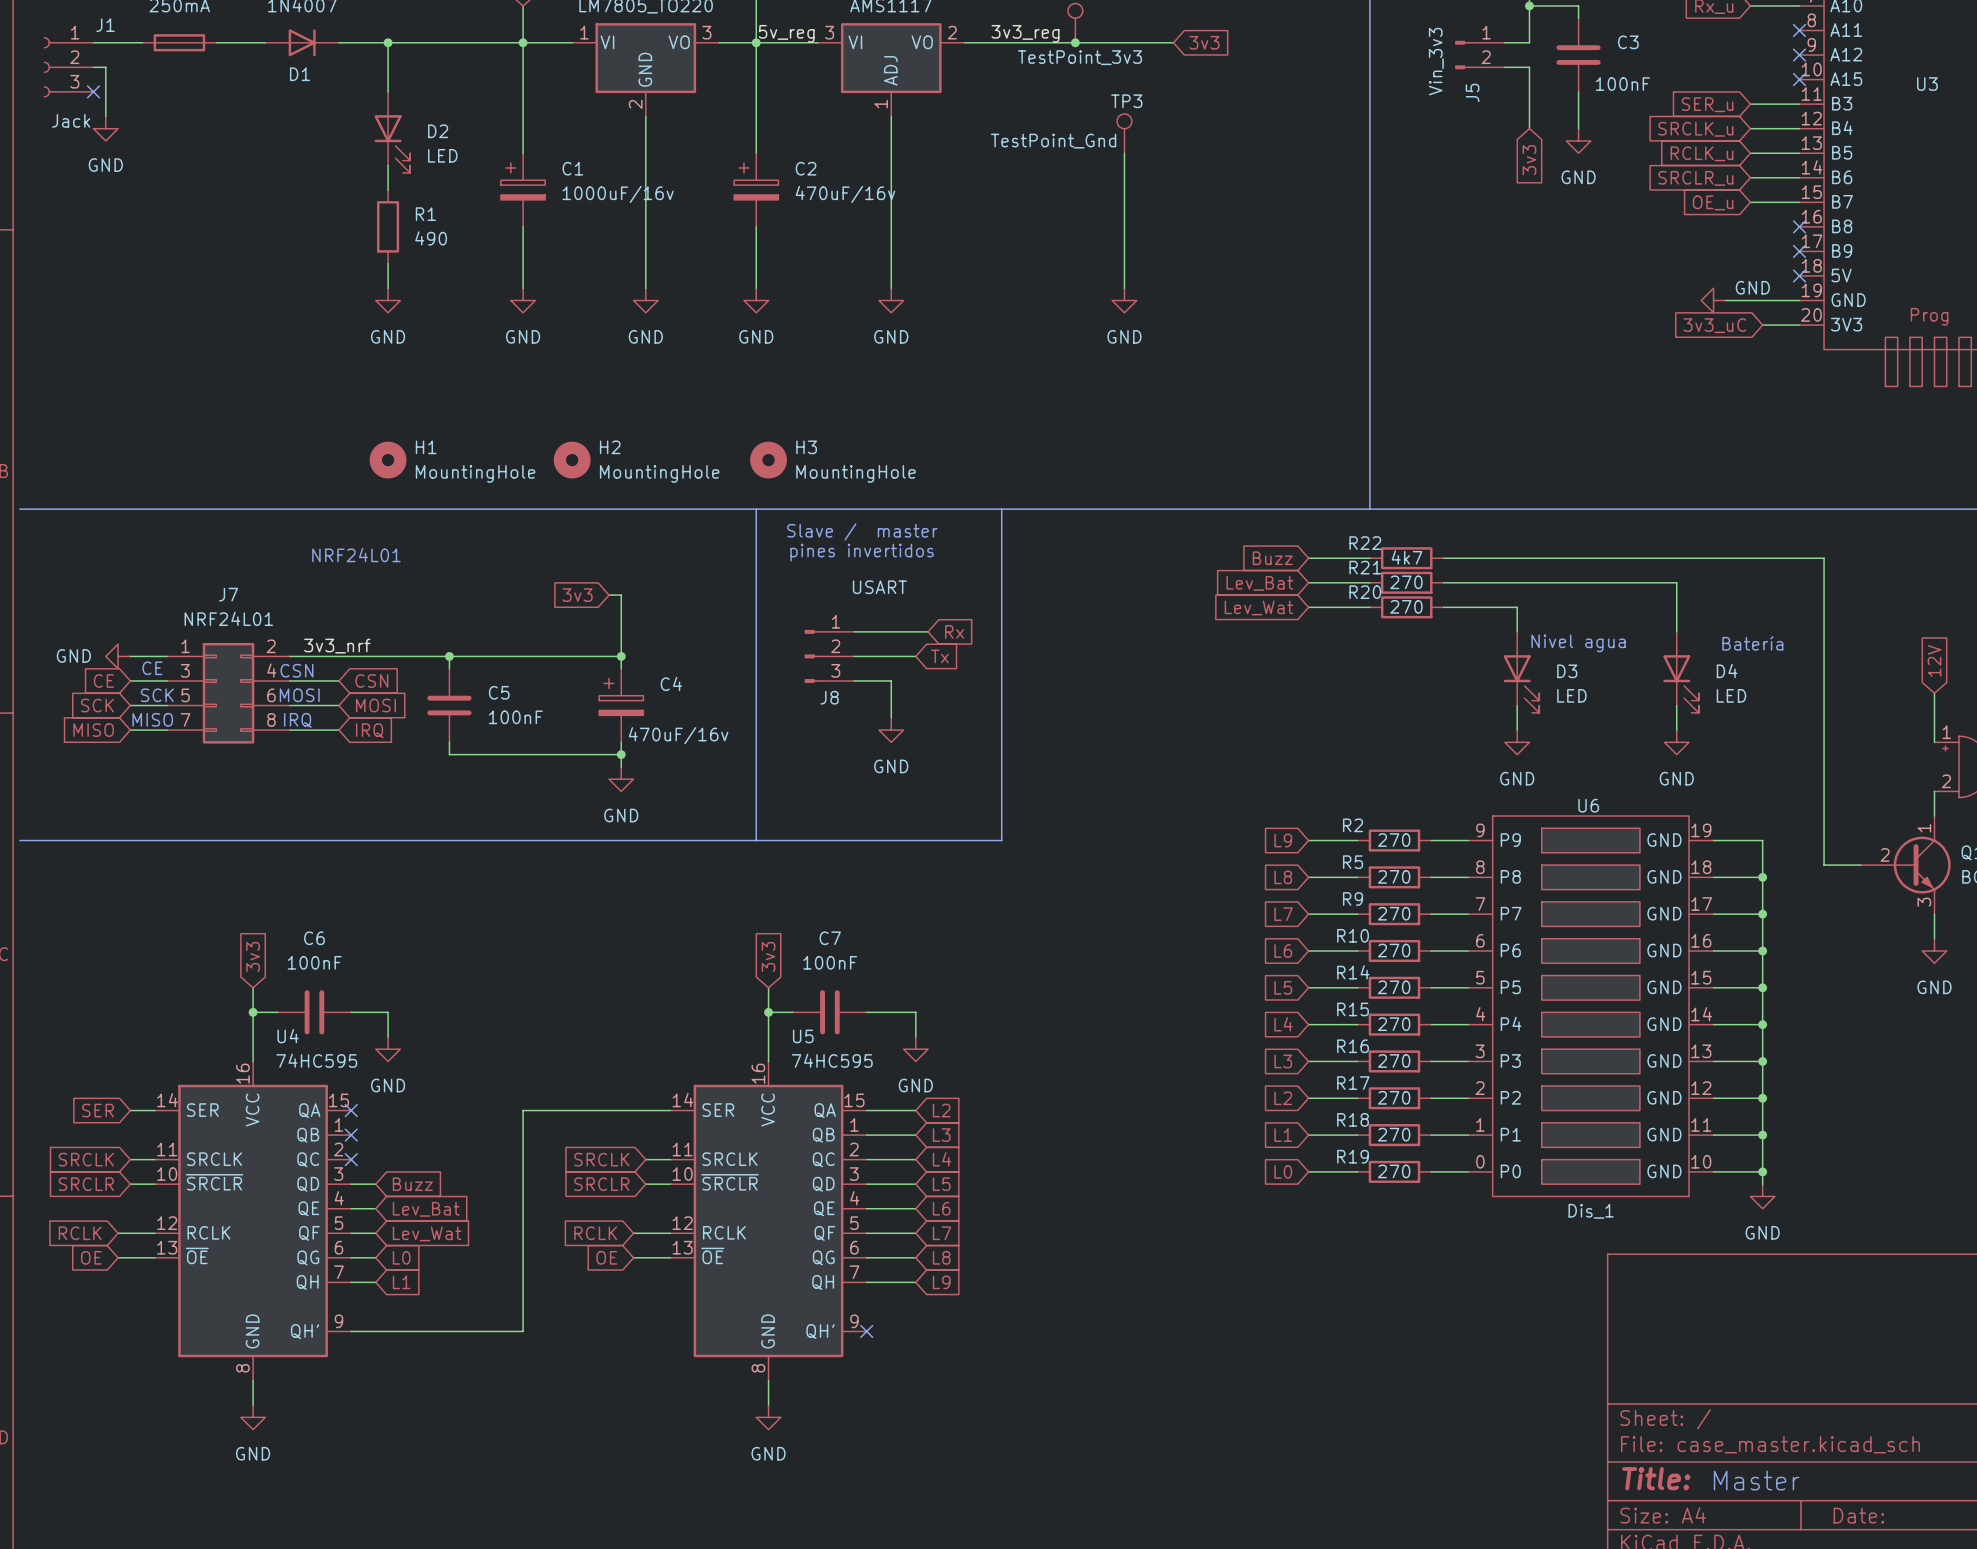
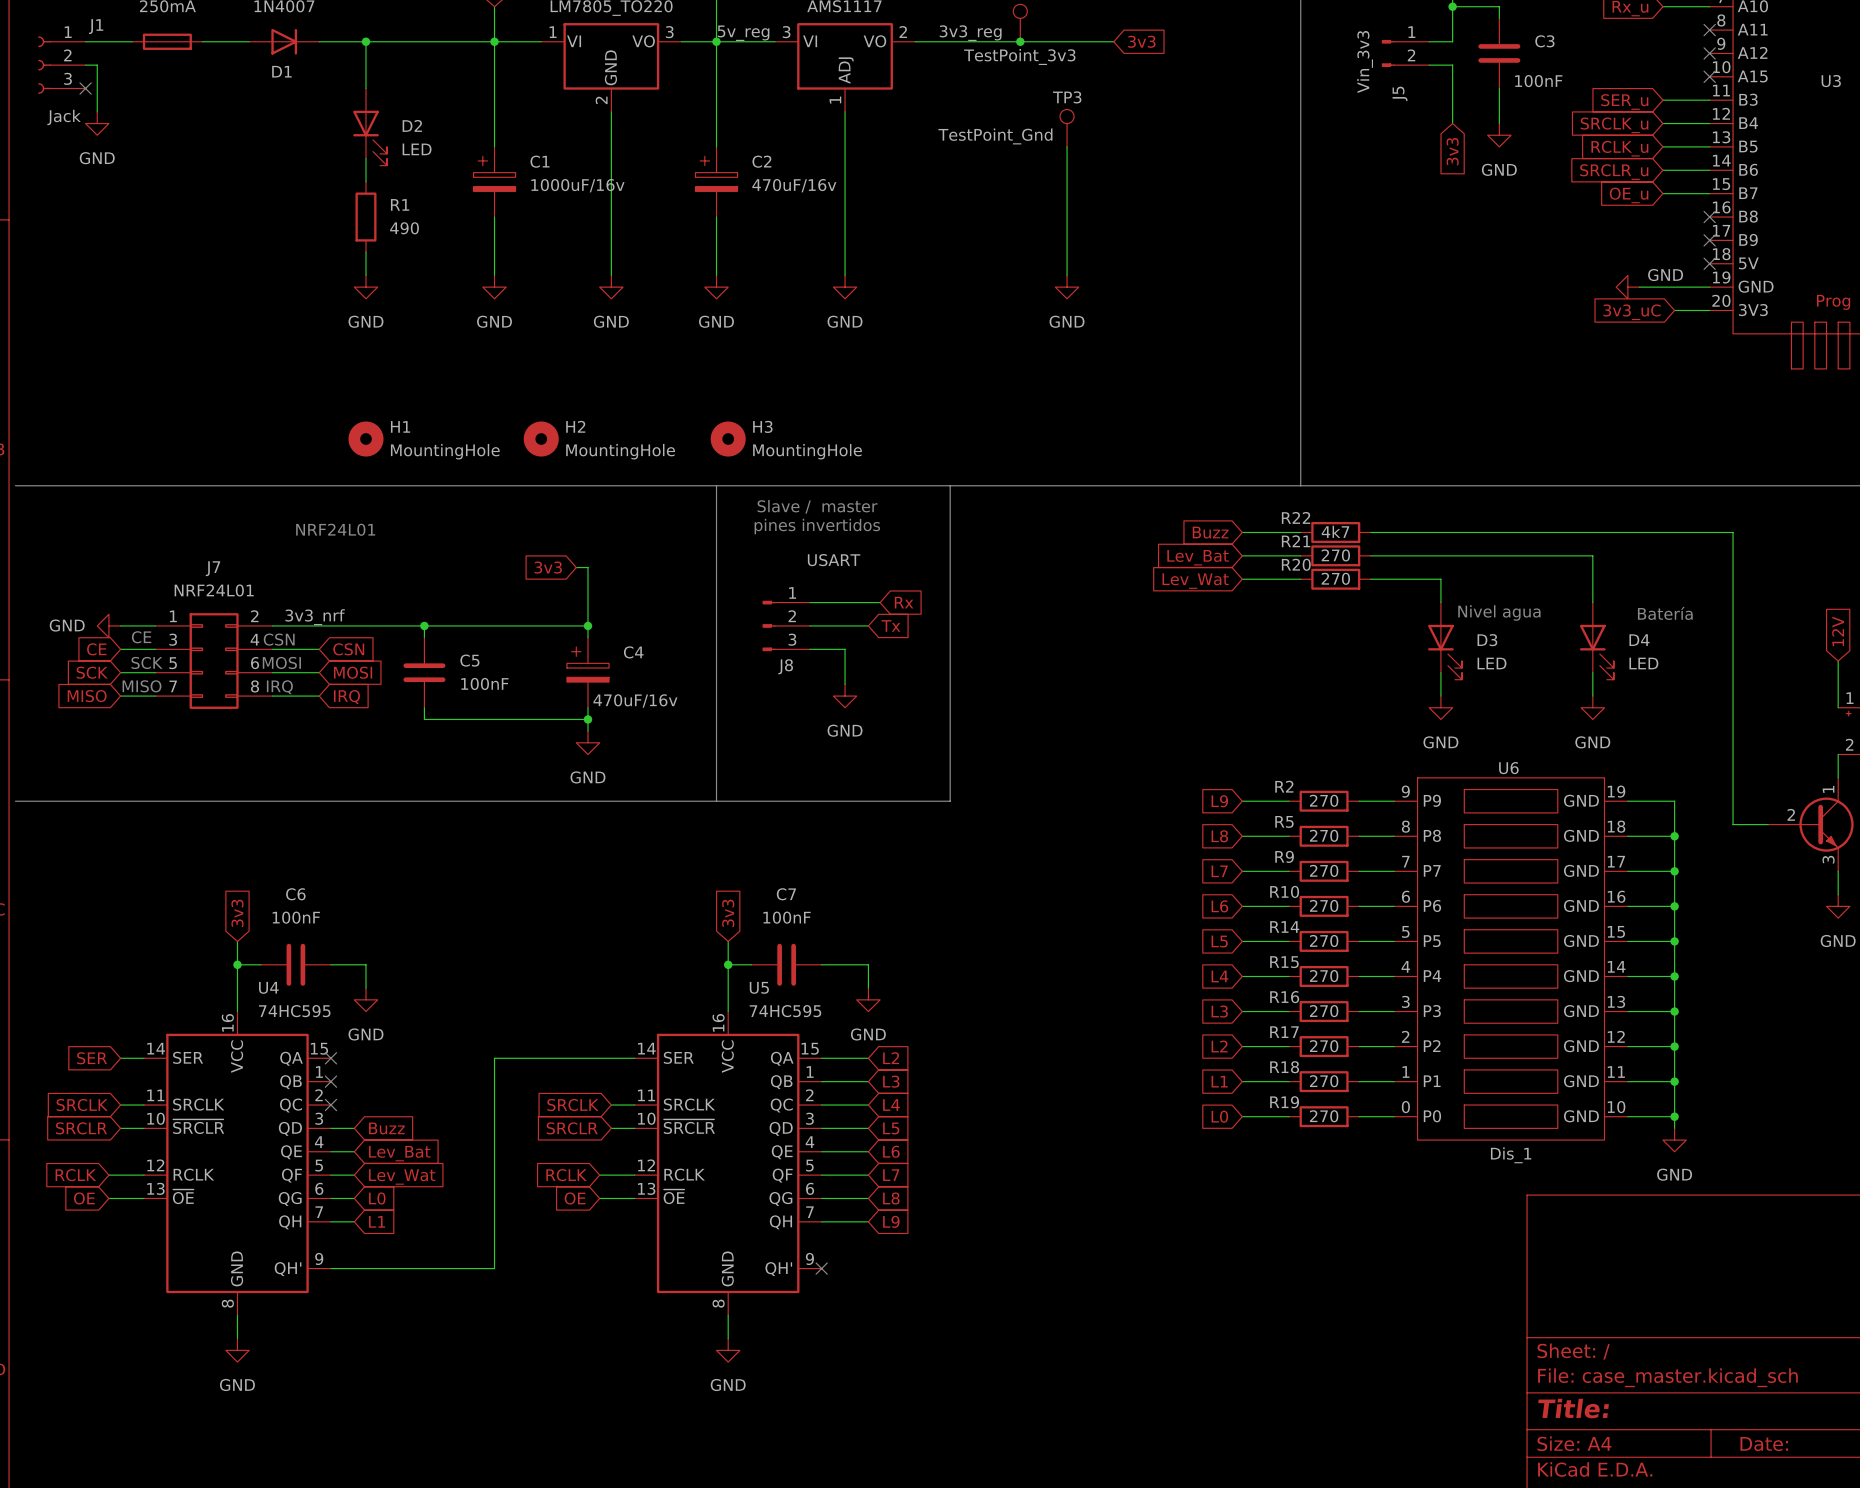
text: Master (1756, 1480) -> none

